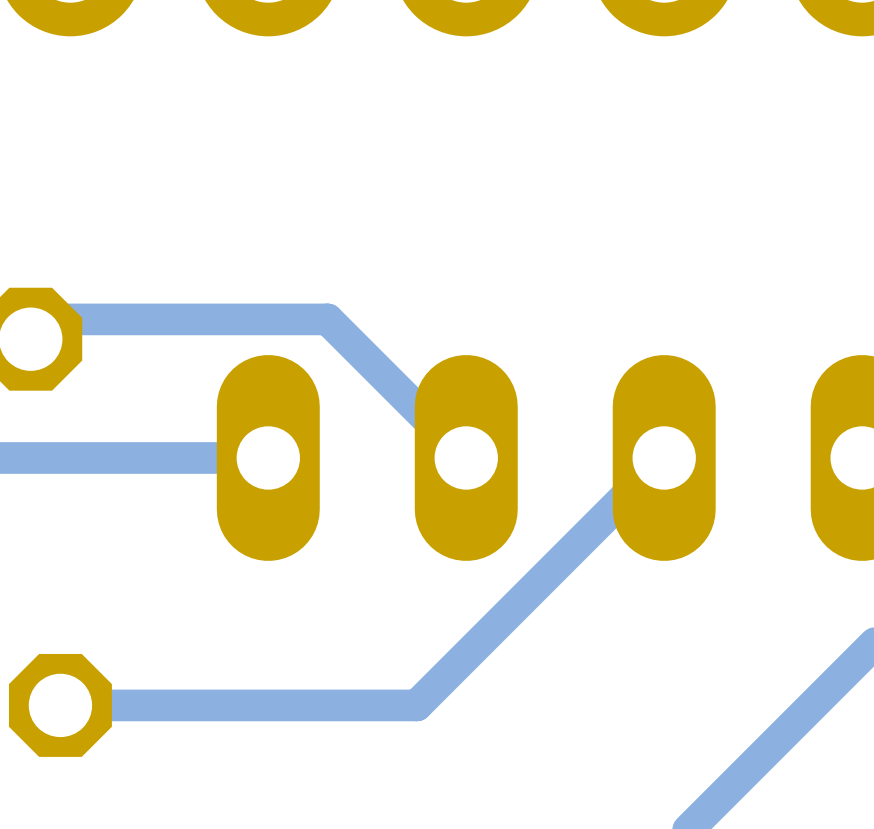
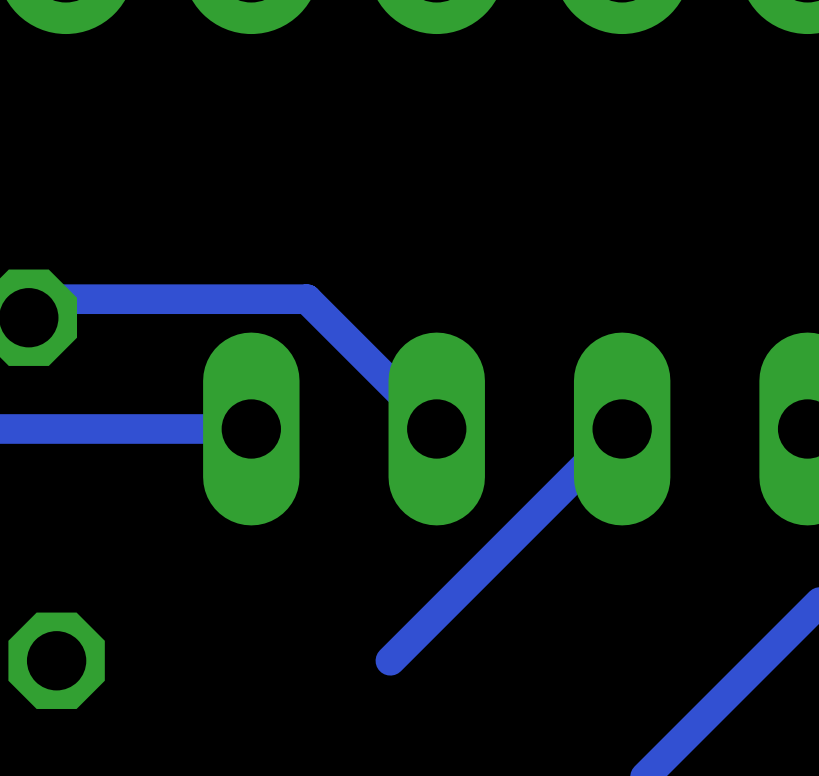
track: (416, 705) (60, 705) -> none

